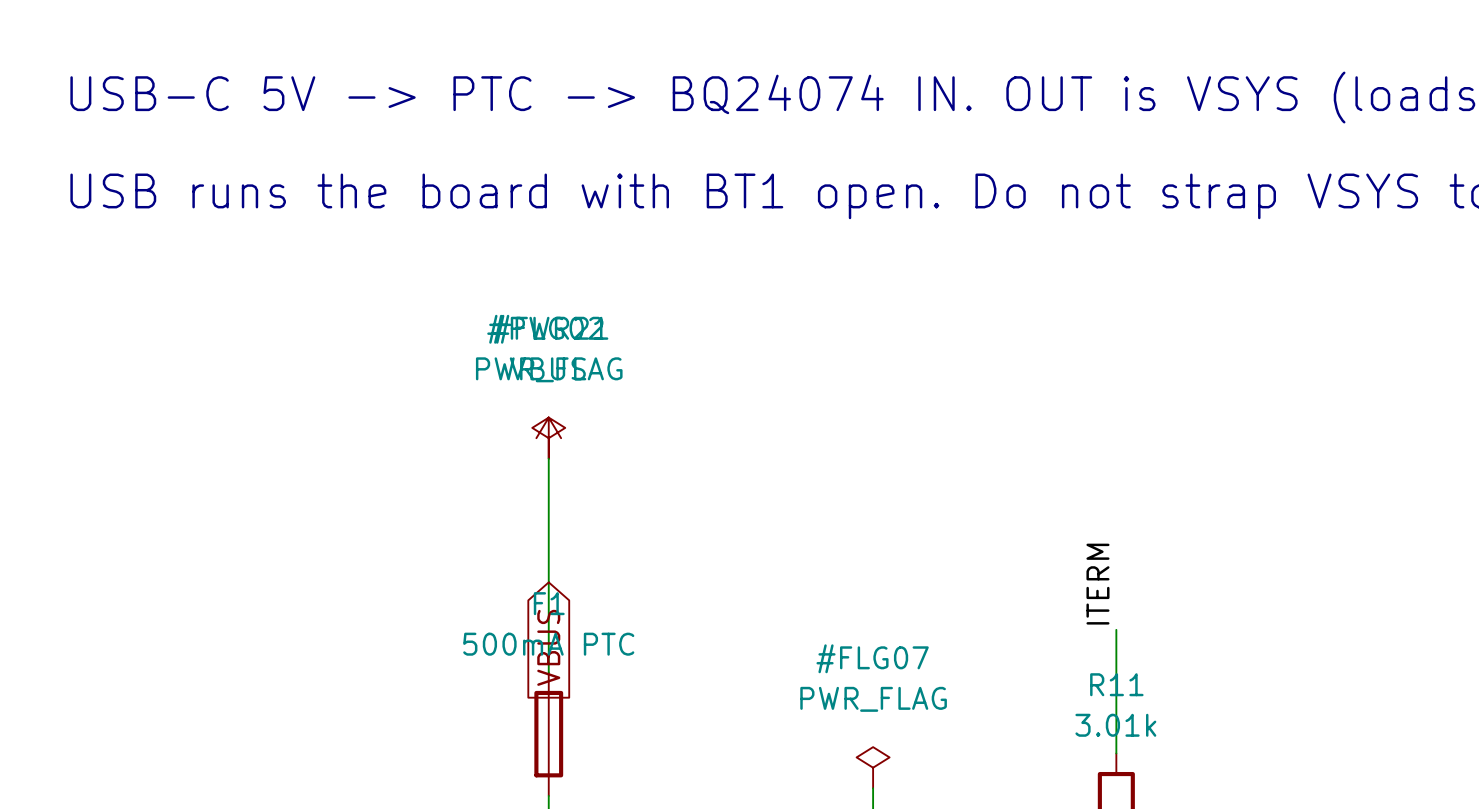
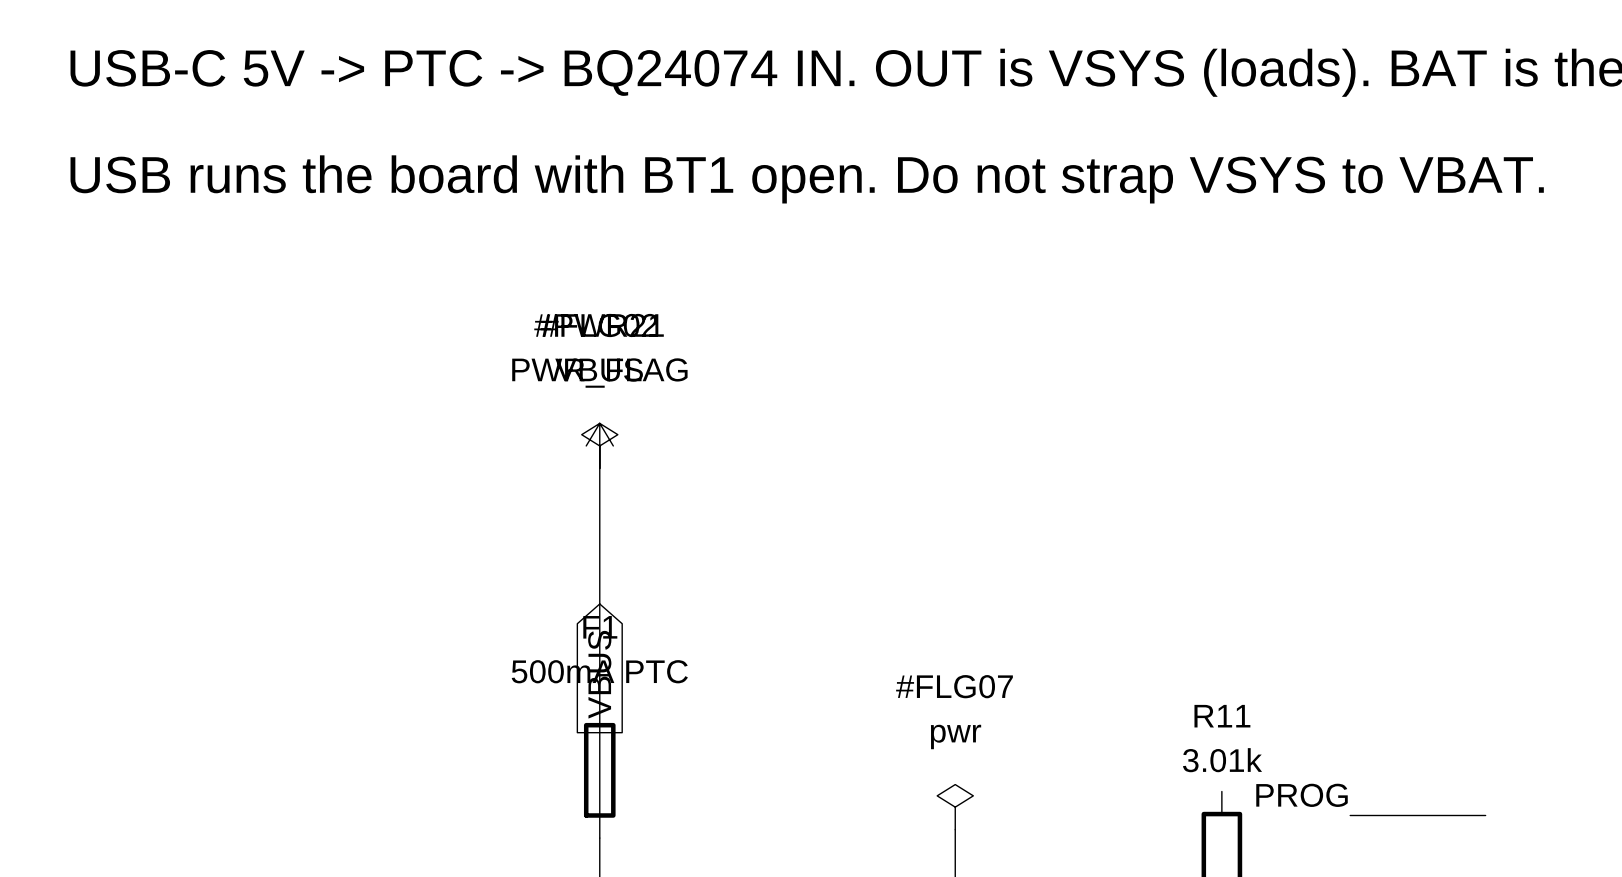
label: ITERM (1097, 584) -> none
wire: (1116, 629) (1116, 753) -> none
label: none -> PROG (1302, 795)
power symbol: PWR_FLAG (873, 767) -> pwr (955, 807)
wire: none -> (1350, 815) (1485, 815)

